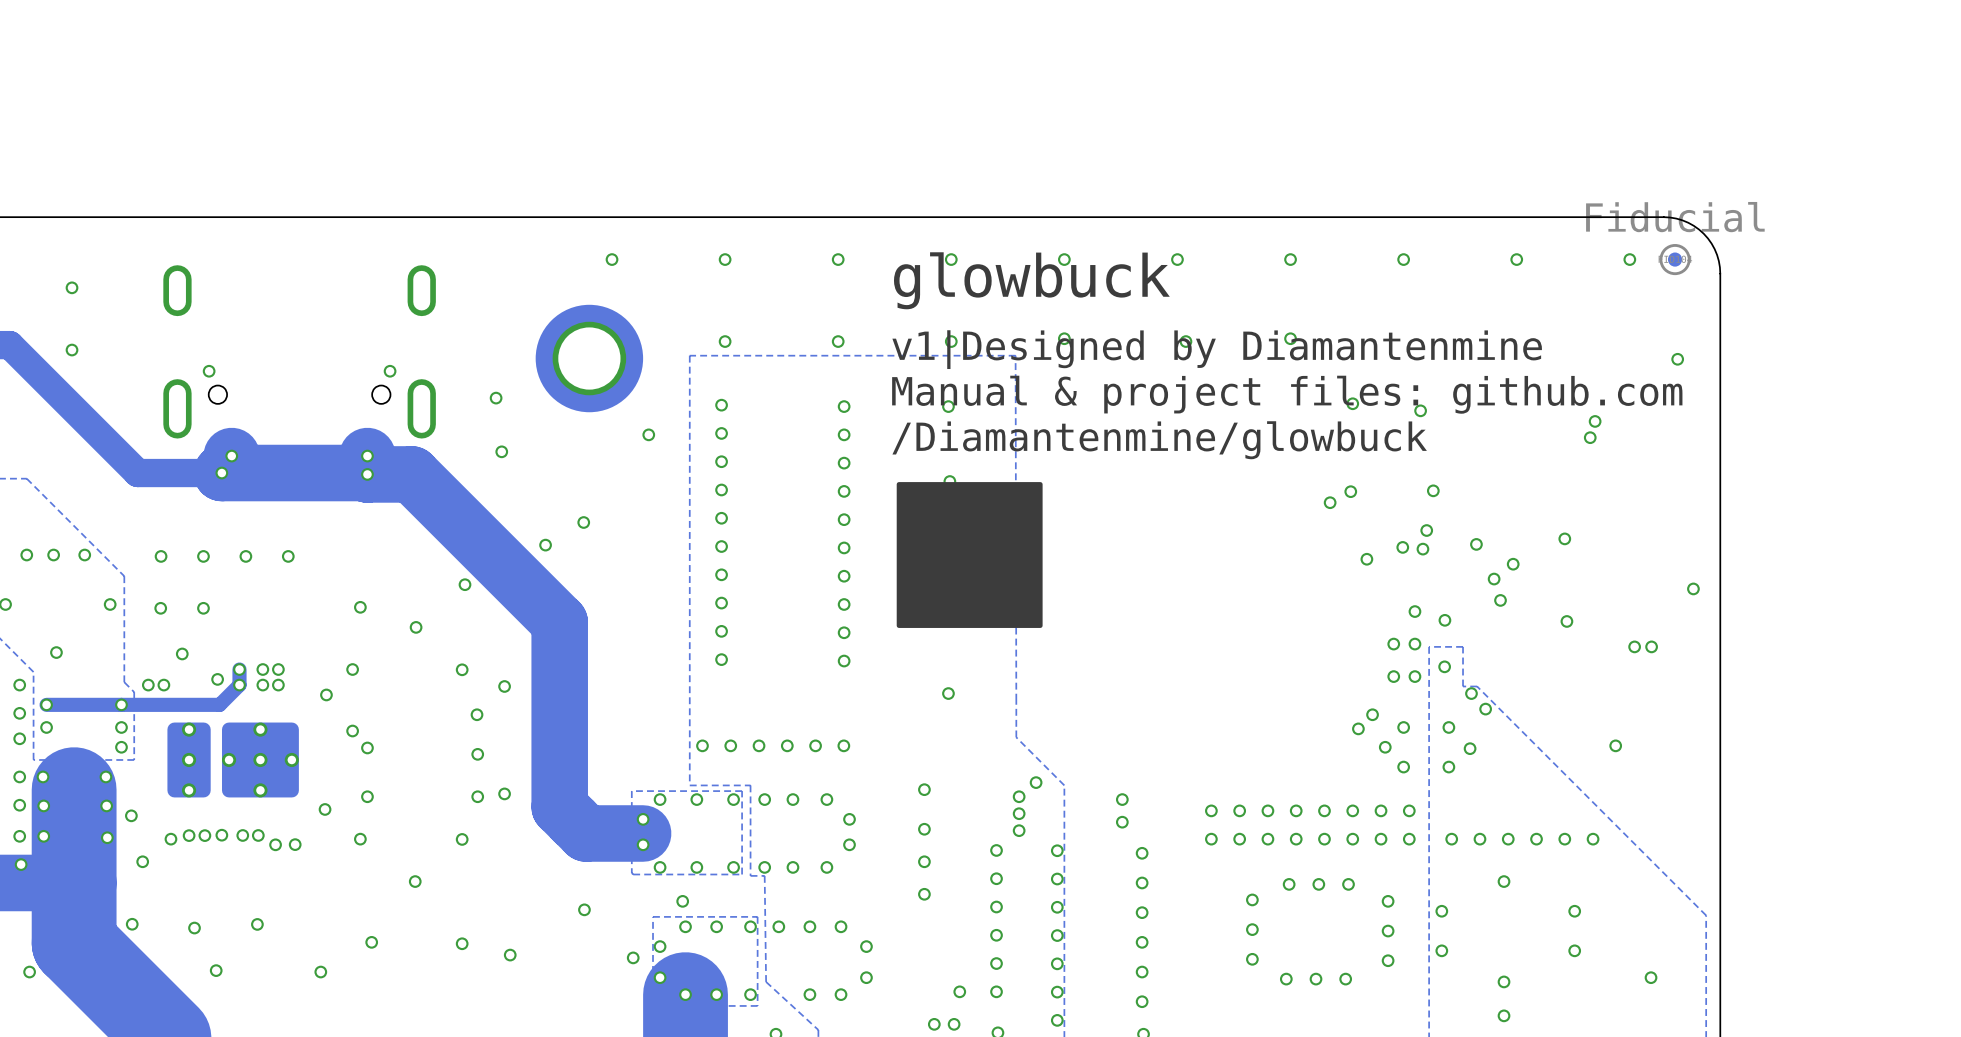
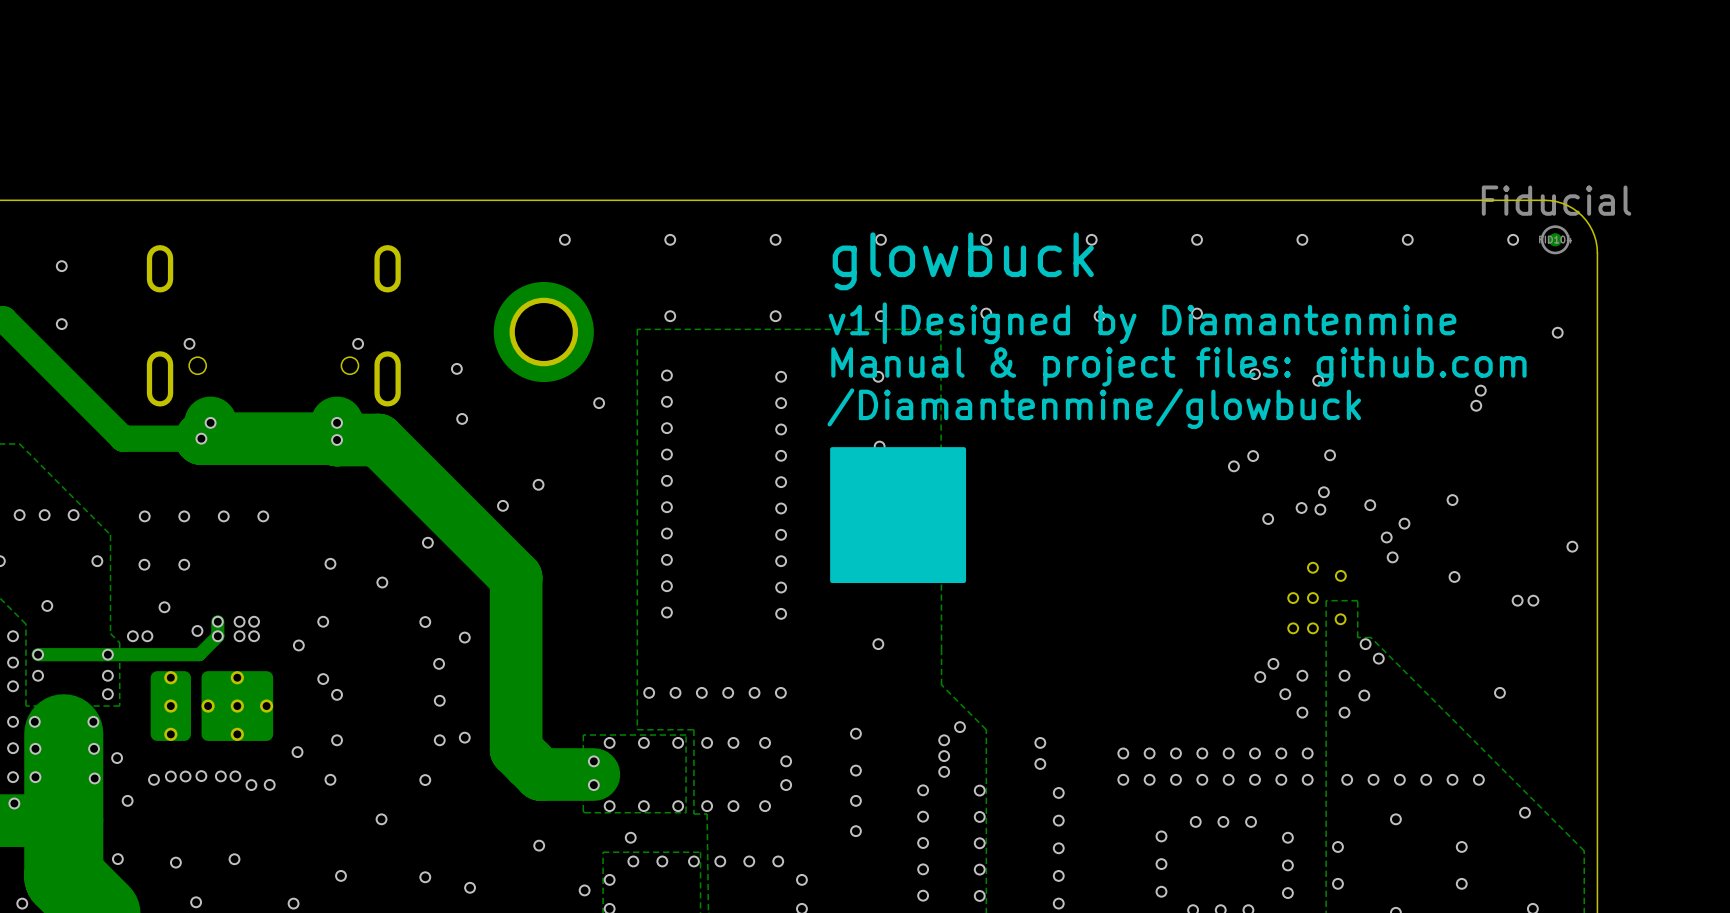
via: none -> (1524, 812)

